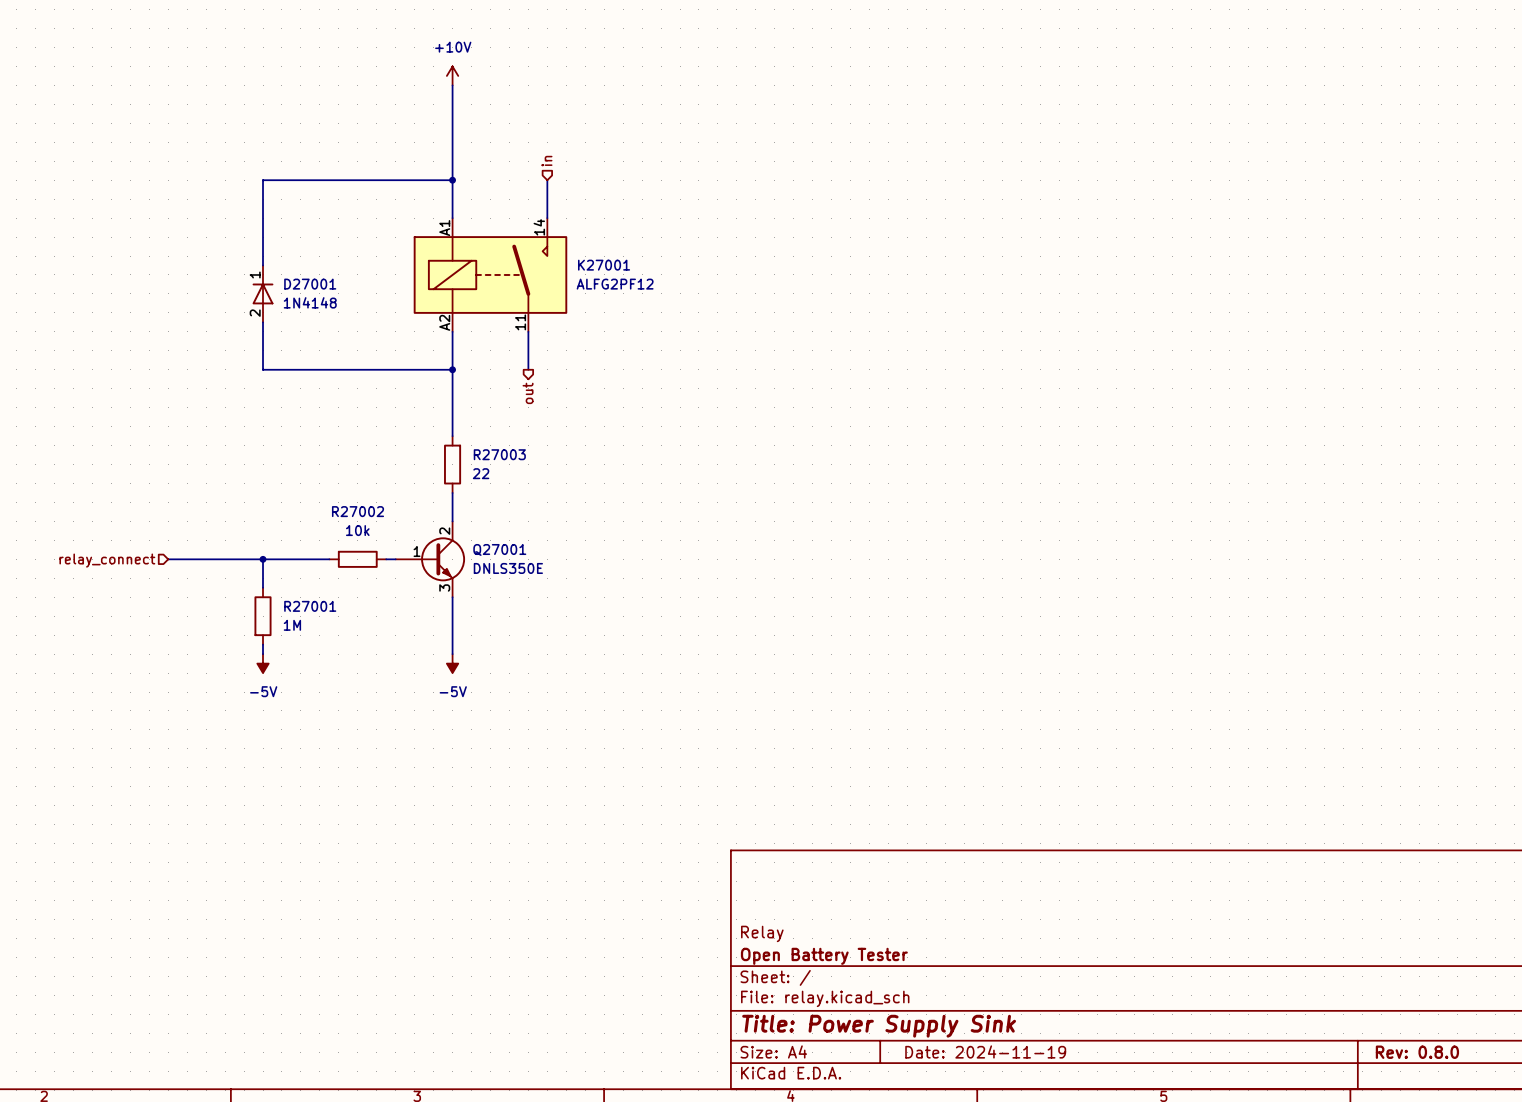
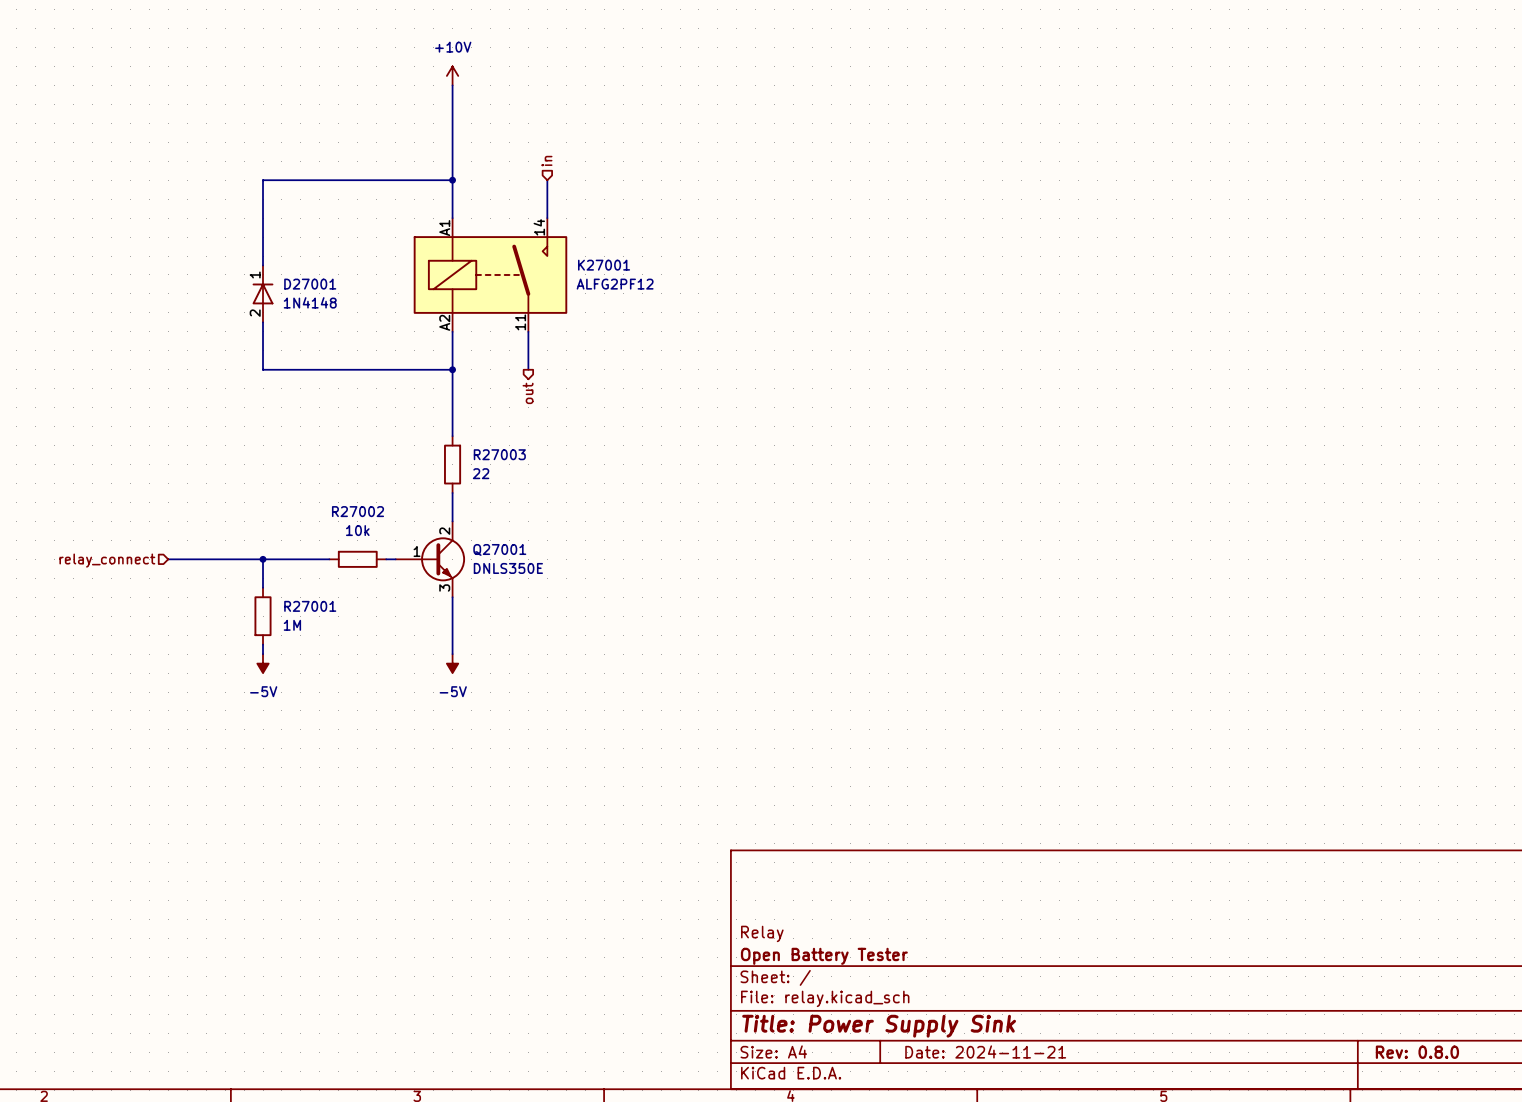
title block: Date: 2024-11-19 (985, 1051) -> Date: 2024-11-21 (985, 1051)

